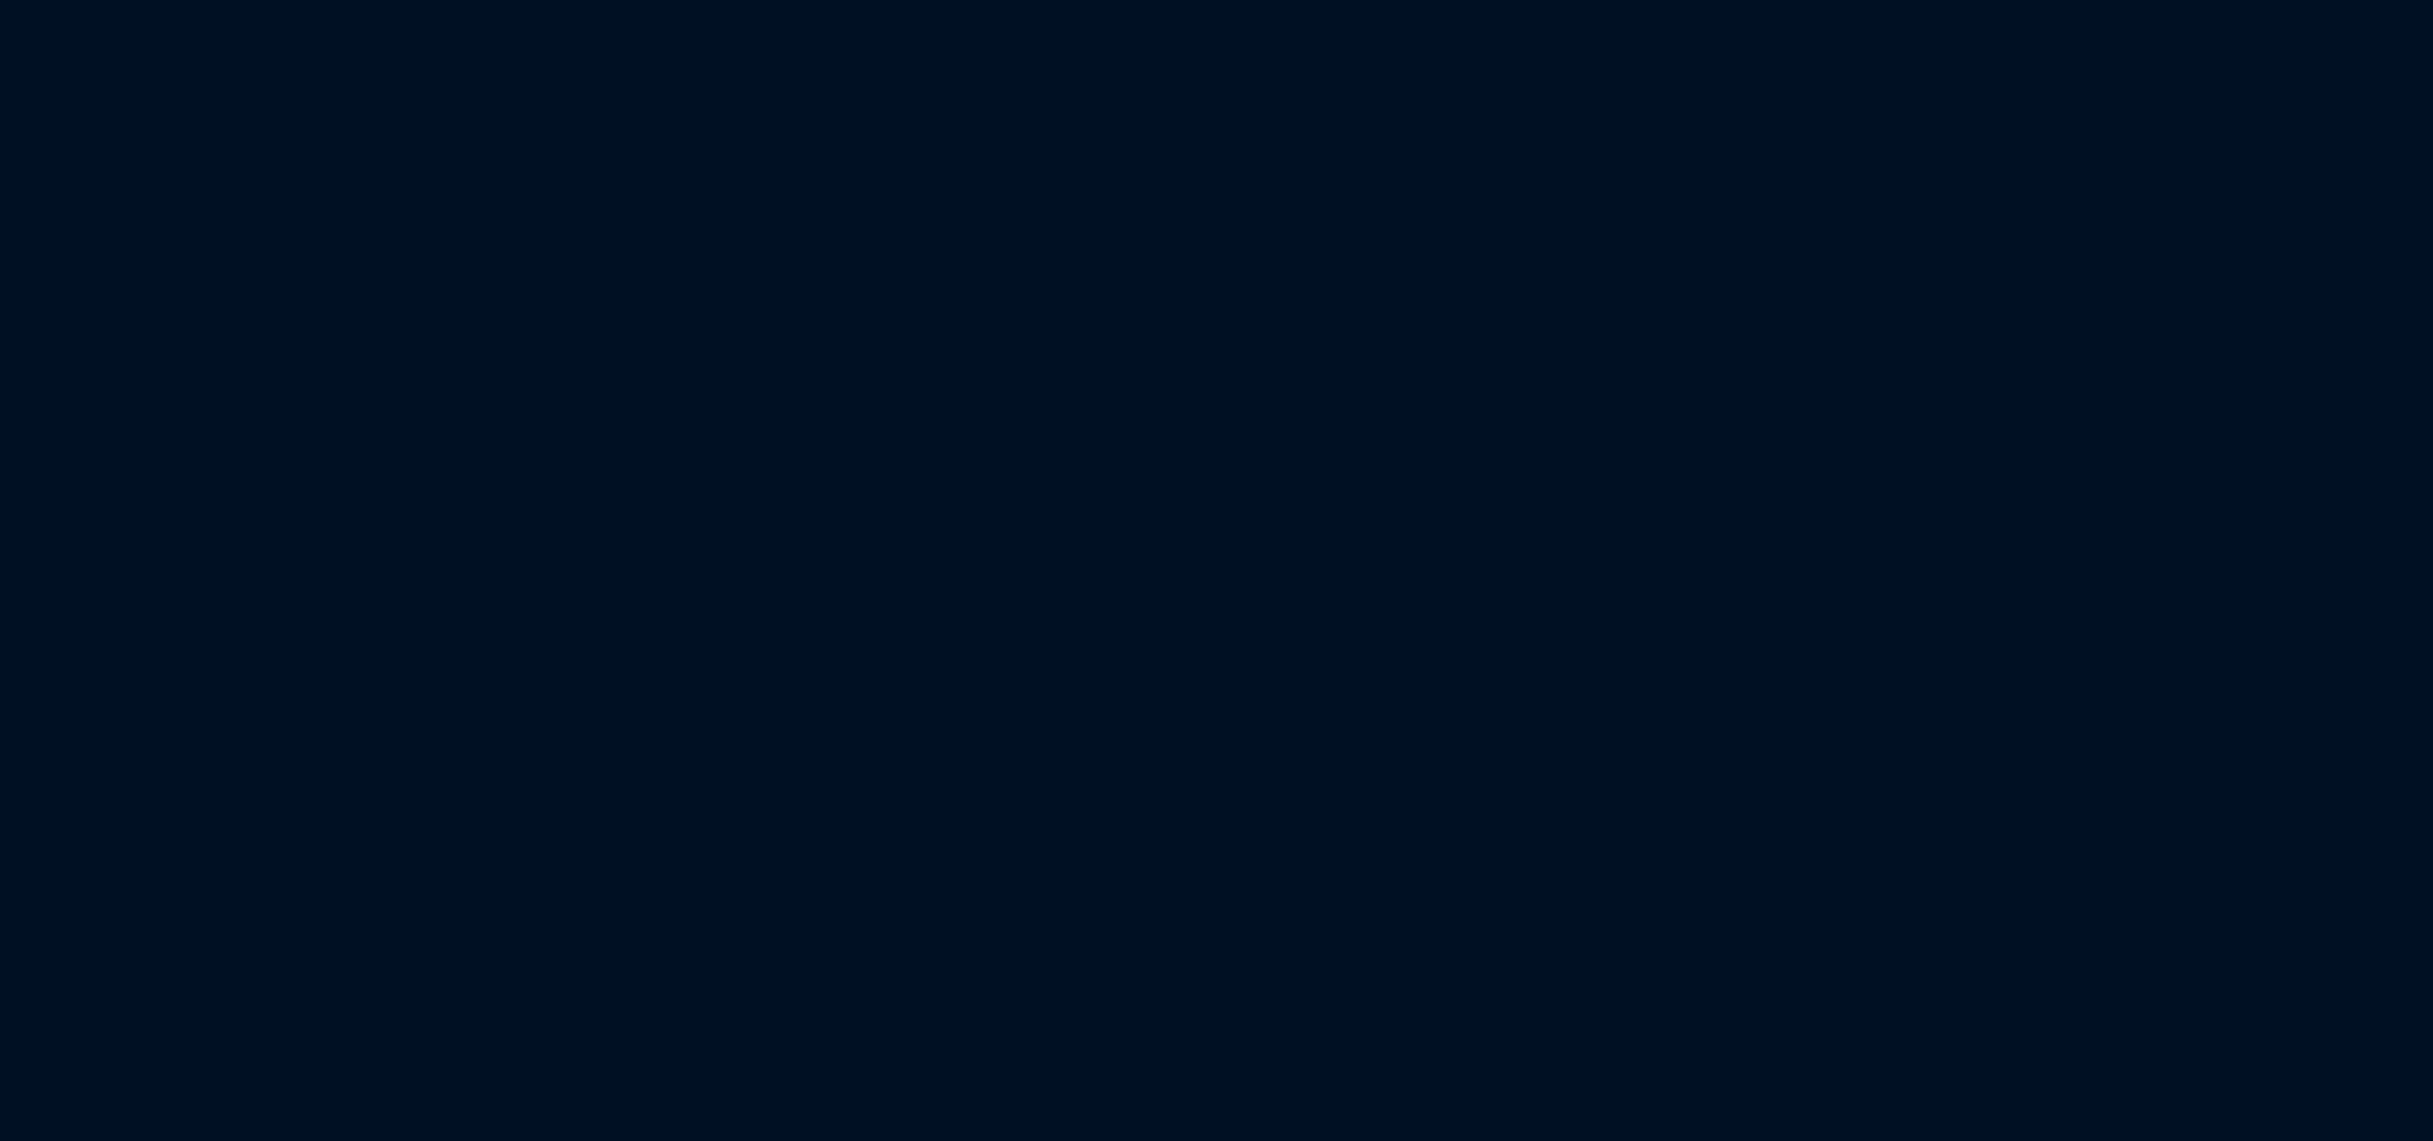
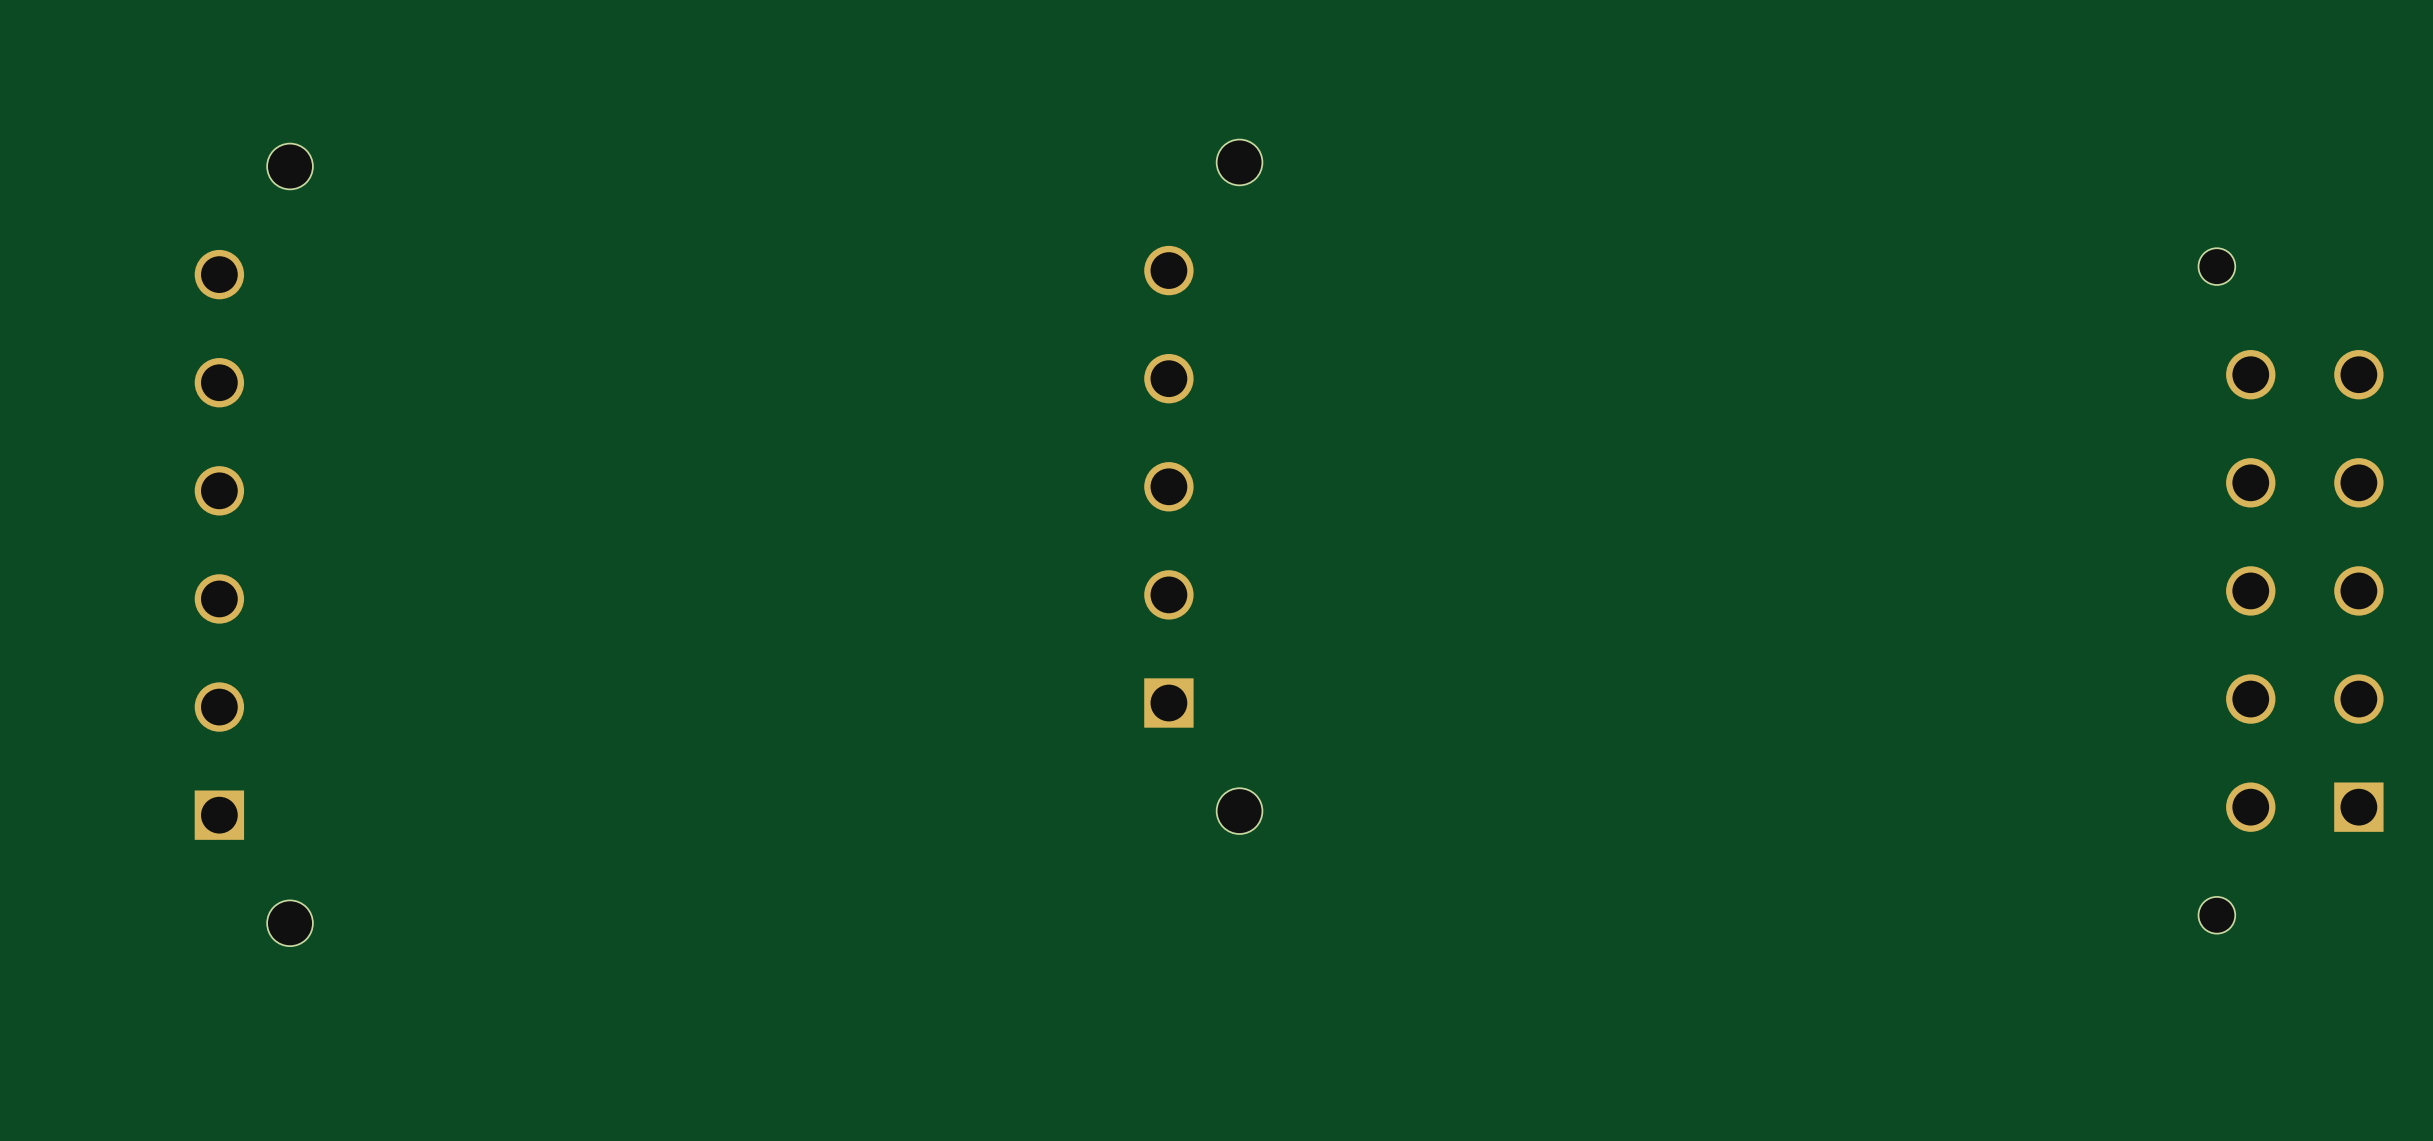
part: none -> (1203, 486)
part: none -> (253, 544)
part: none -> (2291, 590)

